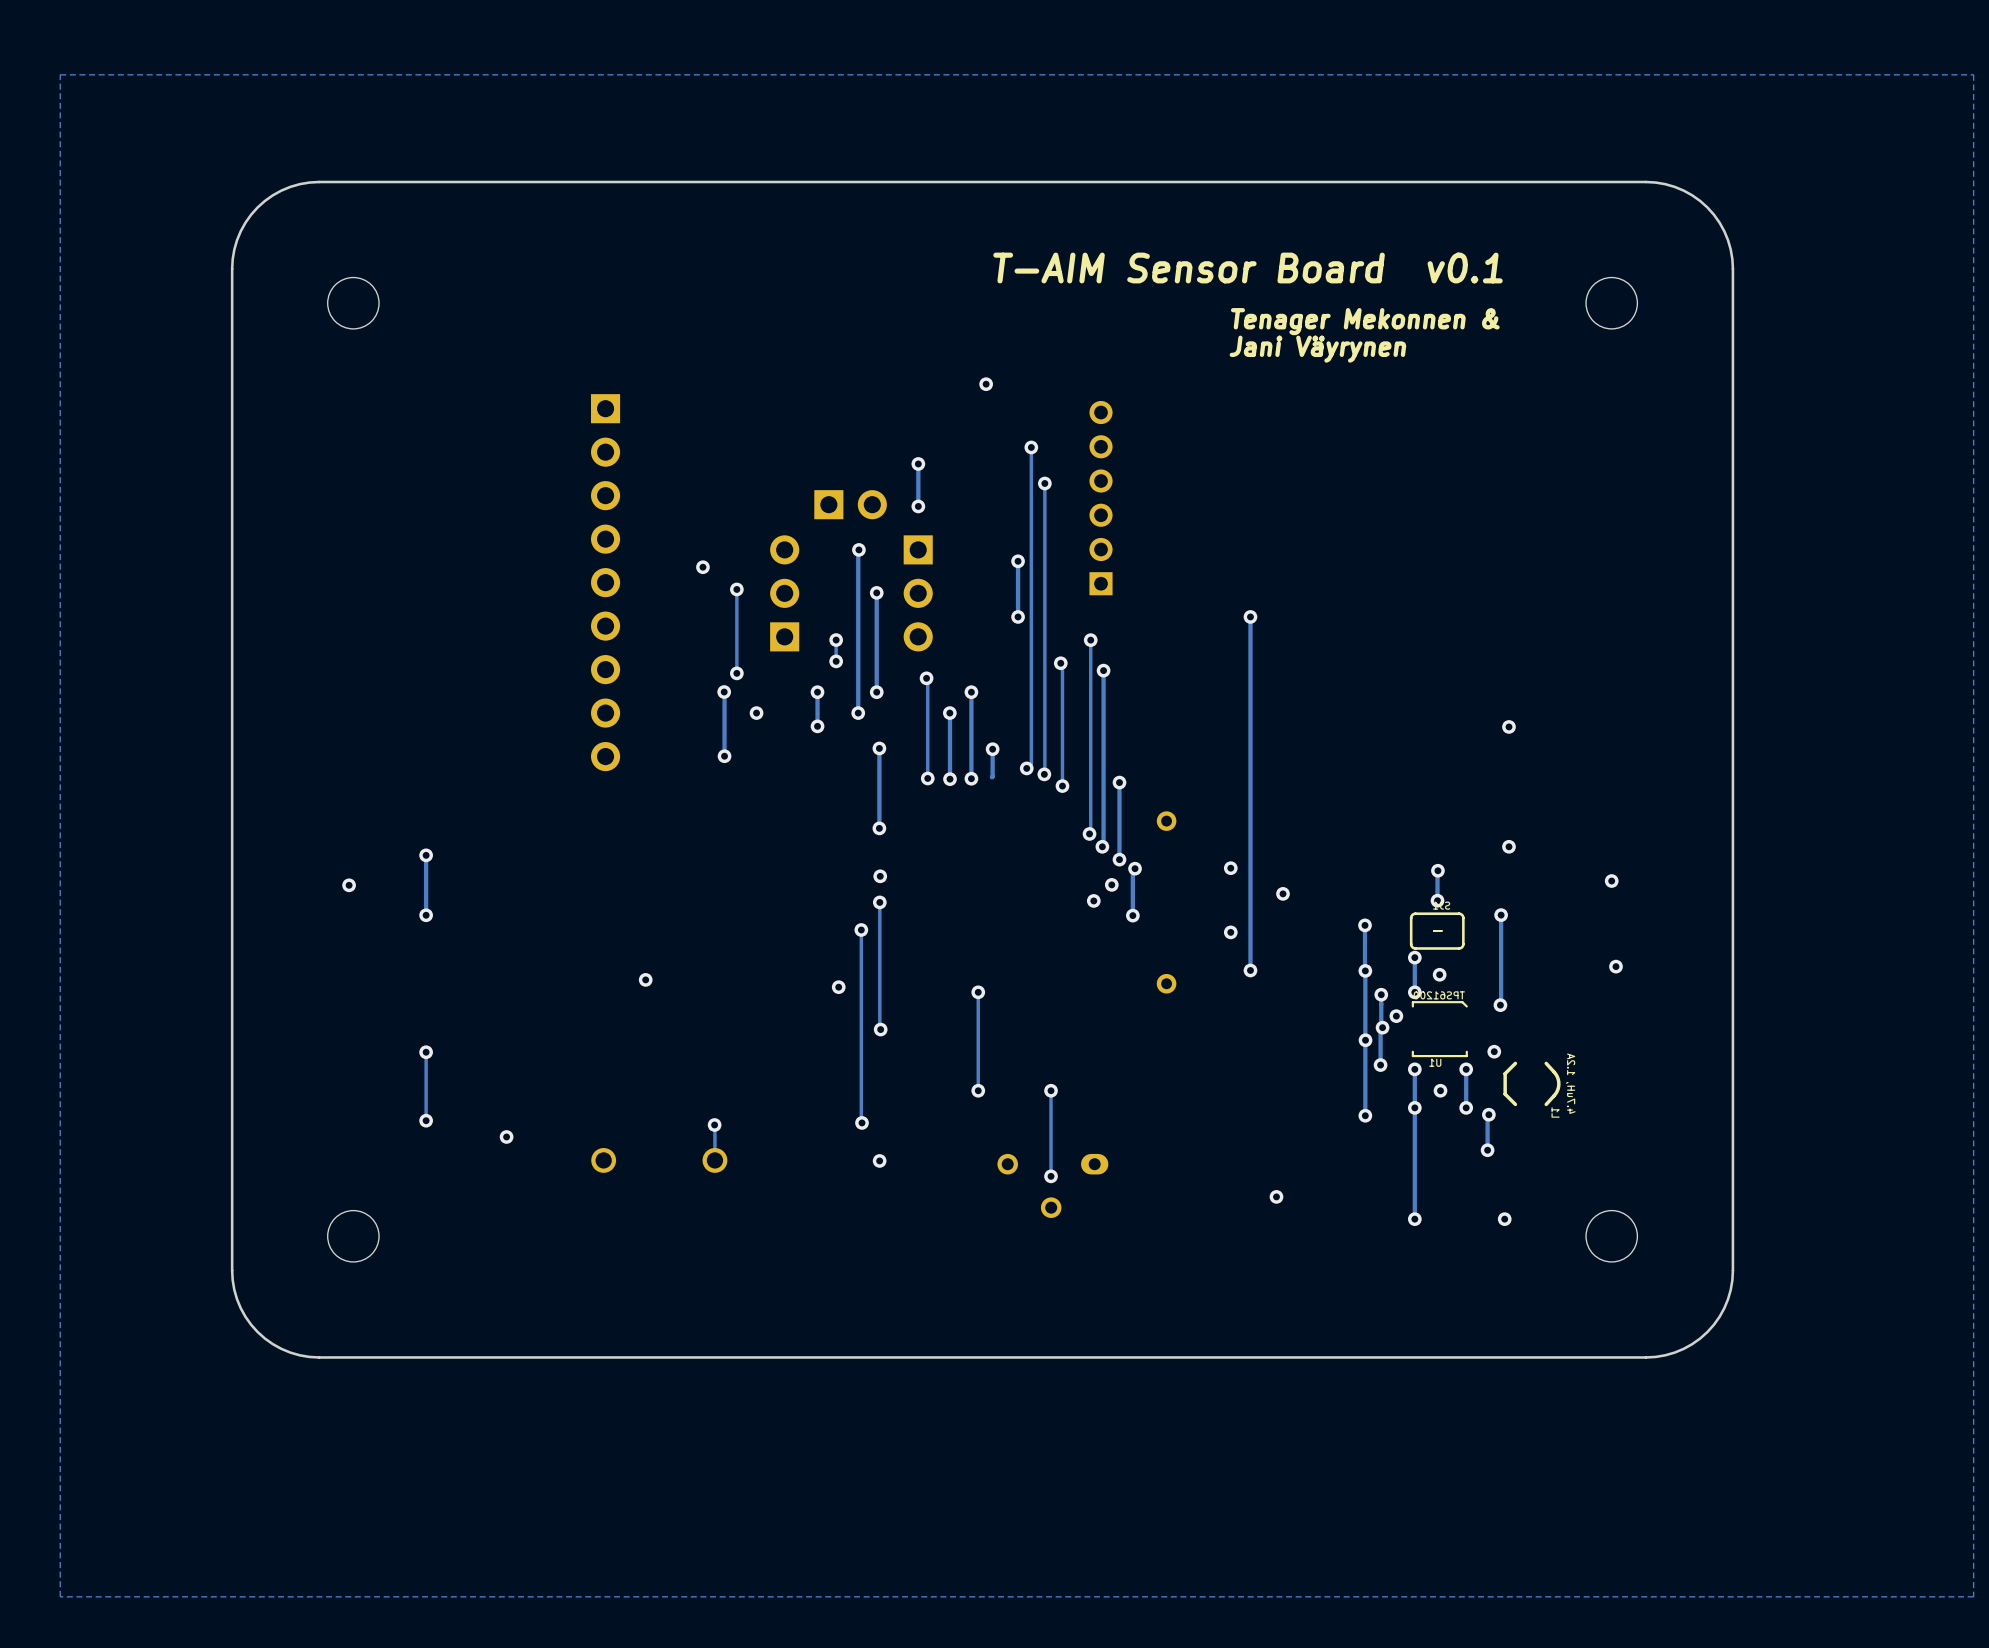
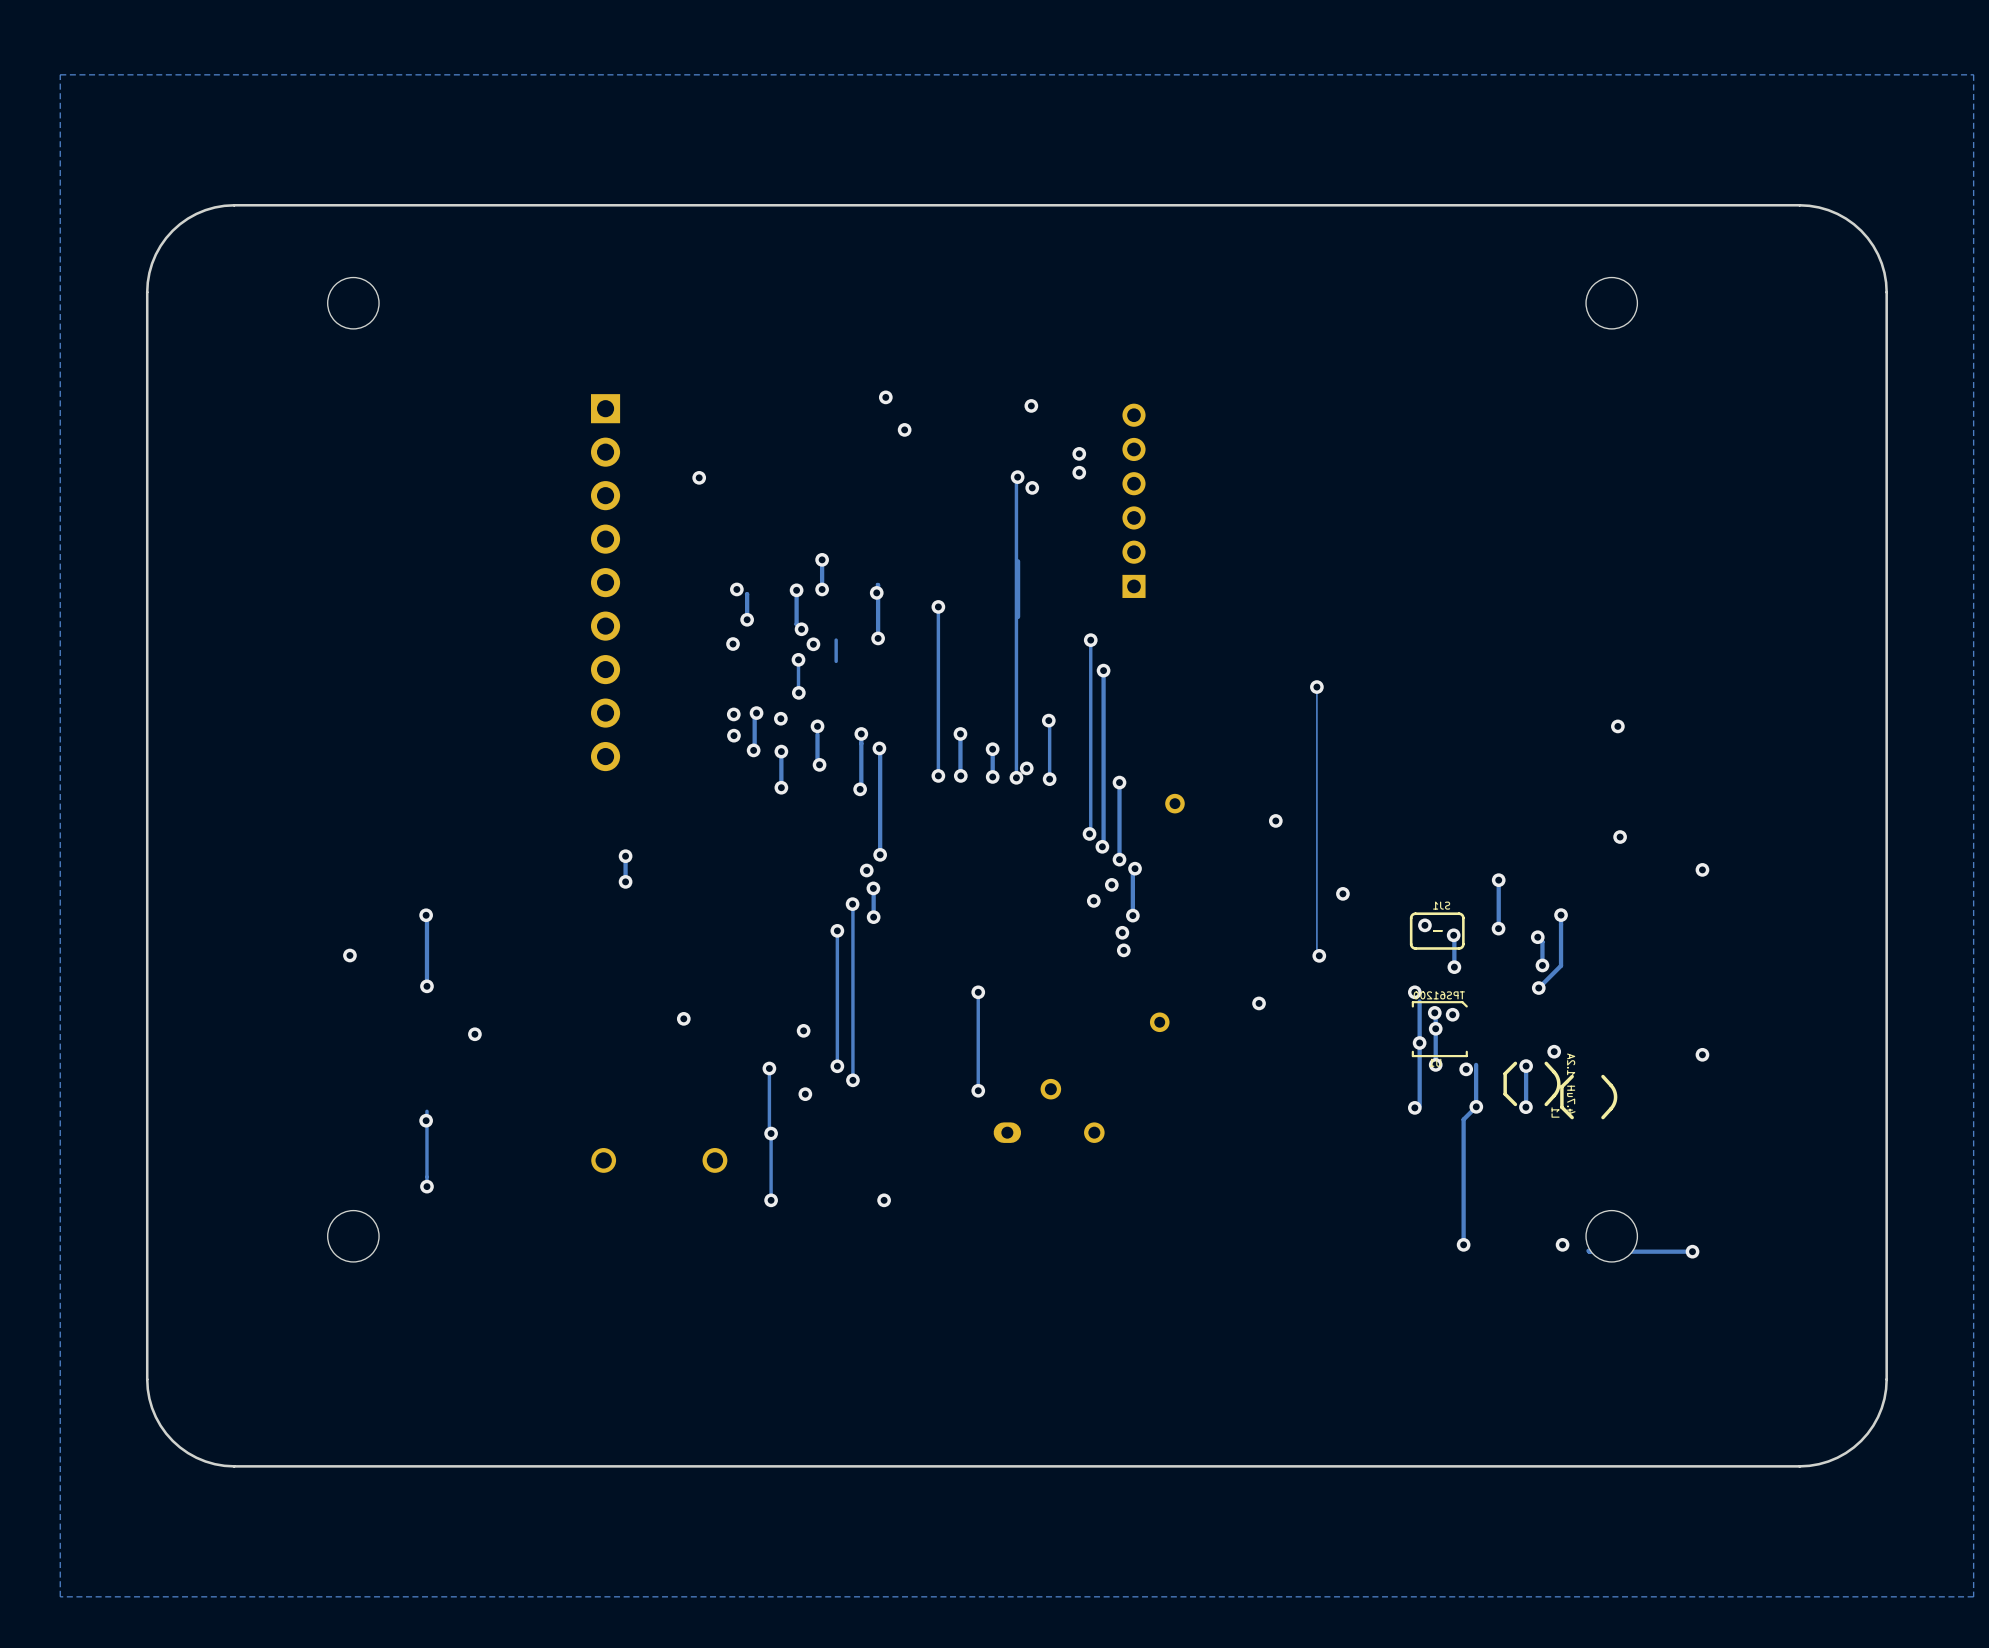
board edge: (1645, 182) (319, 182) (290, 186) (264, 200) (251, 214) (240, 231) (234, 249) (232, 268) (232, 1270) (237, 1299) (251, 1324) (264, 1338) (281, 1348) (299, 1355) (319, 1357) (1645, 1357) (1674, 1352) (1700, 1338) (1713, 1324) (1724, 1308) (1730, 1289) (1732, 1270) (1732, 268) (1728, 240) (1719, 222) (1707, 207) (1683, 190) (1665, 184) (1645, 182) -> (1799, 205) (1819, 207) (1837, 213) (1861, 230) (1873, 245) (1881, 263) (1886, 292) (1886, 1379) (1884, 1398) (1878, 1417) (1867, 1433) (1853, 1447) (1828, 1461) (1799, 1466) (234, 1466) (214, 1464) (196, 1457) (179, 1447) (166, 1433) (152, 1408) (147, 1379) (147, 292) (149, 272) (155, 254) (166, 238) (179, 224) (205, 210) (234, 205) (1799, 205)
text: T-AIM Sensor Board v0.1 (1247, 268) -> none
text: Tenager Mekonnen & (1365, 321) -> none
text: Jani Väyrynen (1317, 349) -> none
via: (986, 384) -> none
via: none -> (885, 397)
via: none -> (1031, 405)
track: (1031, 447) (1031, 763) (1026, 768) -> none
via: (1031, 447) -> none
via: none -> (1079, 453)
track: (918, 463) (918, 506) -> none
via position: (918, 463) -> (904, 429)
via: none -> (1079, 472)
via: none -> (699, 477)
track: none -> (1017, 477) (1016, 777)
via: none -> (1017, 477)
track: (1044, 483) (1044, 774) -> none
via position: (1044, 483) -> (1032, 487)
part position: (1101, 498) -> (1134, 500)
part: (850, 504) -> none
via: (918, 506) -> none
track: (858, 549) (858, 713) -> none
via: (858, 549) -> none
track: none -> (822, 559) (822, 589)
via: none -> (822, 559)
via: (1018, 561) -> none
via: (702, 567) -> none
track: none -> (877, 584) (878, 638)
track: (736, 589) (736, 673) -> none
via: none -> (822, 589)
track: none -> (796, 590) (796, 624) (801, 629)
via: none -> (796, 590)
track: (876, 592) (876, 692) -> none
part: (784, 593) -> none
part: (918, 593) -> none
track: none -> (747, 594) (747, 619)
track: none -> (938, 606) (938, 775)
via: none -> (938, 606)
via: (1018, 616) -> none
track: (1250, 616) (1250, 970) -> none
via position: (1250, 616) -> (1316, 687)
via: none -> (747, 619)
via: none -> (801, 629)
via: none -> (878, 638)
via: (836, 640) -> none
via: none -> (733, 644)
via: none -> (813, 644)
track: none -> (798, 659) (798, 692)
via: none -> (798, 659)
via: (836, 661) -> none
track: (1060, 663) (1062, 664) (1062, 786) -> none
via: (1060, 663) -> none
via: (736, 673) -> none
track: (926, 678) (927, 778) -> none
via: (926, 678) -> none
track: none -> (1316, 687) (1316, 953) (1319, 955)
track: (724, 692) (724, 756) -> none
via: (724, 692) -> none
via: none -> (798, 692)
track: (817, 692) (817, 726) -> none
via: (817, 692) -> none
via: (876, 692) -> none
track: (971, 692) (971, 778) -> none
via: (971, 692) -> none
via position: (858, 713) -> (861, 733)
via: (949, 713) -> none
track: (950, 713) (950, 779) -> none
via: none -> (733, 714)
track: none -> (754, 718) (753, 750)
via: none -> (780, 718)
track: none -> (1048, 720) (1049, 779)
via: none -> (1048, 720)
via: (1508, 726) -> none
via: none -> (1617, 726)
track: none -> (861, 733) (860, 789)
track: none -> (960, 733) (960, 775)
via: none -> (960, 733)
track: none -> (817, 734) (817, 762) (819, 764)
via: none -> (733, 735)
track: (879, 748) (879, 828) -> (879, 748) (880, 854)
via: none -> (753, 750)
track: none -> (781, 751) (781, 787)
via: none -> (781, 751)
via: (724, 756) -> none
via: none -> (819, 764)
via: (1044, 774) -> none
via: none -> (938, 775)
via: none -> (960, 775)
via: none -> (992, 776)
via: none -> (1016, 777)
via: (927, 778) -> none
via: (971, 778) -> none
via: (950, 779) -> none
via: none -> (1049, 779)
via: (1062, 786) -> none
via: none -> (781, 787)
via: none -> (860, 789)
via: none -> (1275, 820)
part position: (1166, 821) -> (1174, 803)
via: (879, 828) -> none
via: none -> (1620, 837)
via: (1508, 846) -> none
via: none -> (880, 854)
track: (426, 855) (426, 915) -> none
via: (426, 855) -> none
track: none -> (625, 856) (625, 881)
via: none -> (625, 856)
via: (1230, 868) -> none
via: none -> (1702, 869)
via: none -> (866, 870)
via: (1437, 870) -> none
track: (1438, 871) (1437, 900) -> none
via: (880, 876) -> none
track: none -> (1498, 880) (1498, 928)
via: none -> (1498, 880)
via: none -> (625, 881)
via: (1611, 881) -> none
via: (349, 885) -> none
track: none -> (873, 888) (873, 917)
via: none -> (873, 888)
via: (1283, 893) -> none
via: none -> (1342, 893)
via: (1437, 900) -> none
track: (879, 902) (880, 1029) -> none
via: (879, 902) -> none
track: none -> (852, 904) (852, 1080)
via: none -> (852, 904)
track: (1501, 915) (1500, 1005) -> none
via position: (1501, 915) -> (1498, 928)
track: none -> (1561, 915) (1561, 965) (1538, 988)
via: none -> (1561, 915)
via: none -> (873, 917)
track: (1365, 925) (1365, 1040) -> none
via: (1365, 925) -> none
via: none -> (1424, 925)
track: (861, 929) (862, 1122) -> none
via: (861, 929) -> none
track: none -> (837, 930) (837, 1066)
via: none -> (837, 930)
via: none -> (1122, 932)
via: (1230, 932) -> none
track: none -> (1453, 935) (1454, 967)
via: none -> (1453, 935)
track: none -> (1537, 937) (1542, 941) (1542, 965)
via: none -> (1537, 937)
via: none -> (1123, 950)
via: none -> (349, 955)
via: none -> (1319, 955)
track: (1414, 957) (1414, 992) -> none
via: (1414, 957) -> none
via: none -> (1542, 965)
via: (1615, 966) -> none
via position: (1250, 970) -> (1259, 1003)
via: (1365, 970) -> none
via position: (1439, 974) -> (1454, 967)
via: (645, 979) -> none
part position: (1166, 983) -> (1159, 1022)
via: none -> (426, 986)
via: (838, 987) -> none
via: none -> (1538, 988)
track: (1381, 994) (1381, 1026) -> none
via: (1381, 994) -> none
track: none -> (1419, 1001) (1419, 1106)
via: (1500, 1005) -> none
track: none -> (1434, 1012) (1435, 1064)
via: none -> (1434, 1012)
via: none -> (1452, 1014)
via: (1396, 1016) -> none
via: none -> (683, 1018)
track: (1381, 1026) (1380, 1065) -> none
via: (1382, 1027) -> none
via: none -> (1435, 1028)
via: (880, 1029) -> none
via: none -> (803, 1030)
via: none -> (474, 1034)
track: (1365, 1040) (1365, 1115) -> none
via: (1365, 1040) -> none
via: none -> (1419, 1042)
via: (1494, 1051) -> none
via: none -> (1554, 1051)
track: (426, 1052) (426, 1120) -> (426, 917) (426, 986)
via: (426, 1052) -> none
via: none -> (1702, 1054)
via: none -> (1435, 1064)
track: none -> (1476, 1064) (1476, 1106)
via: (1380, 1065) -> none
via: none -> (837, 1066)
track: none -> (1526, 1066) (1526, 1107)
via: none -> (1526, 1066)
track: none -> (769, 1068) (771, 1200)
via: none -> (769, 1068)
track: (1414, 1069) (1414, 1219) -> none
via: (1414, 1069) -> none
track: (1466, 1069) (1466, 1107) -> none
via: none -> (852, 1080)
track: (1051, 1090) (1051, 1176) -> none
via: (1051, 1090) -> none
via: (1440, 1090) -> none
via: none -> (805, 1094)
part: none -> (1588, 1097)
track: none -> (1476, 1106) (1463, 1119) (1463, 1244)
via: none -> (1476, 1106)
via: (1466, 1107) -> none
via: none -> (1525, 1107)
track: none -> (426, 1111) (426, 1186)
track: (1488, 1114) (1487, 1150) -> none
via: (1488, 1114) -> none
via: (1365, 1115) -> none
via: (862, 1122) -> none
track: (714, 1124) (714, 1160) -> none
via: (714, 1124) -> none
via: none -> (771, 1133)
via: (506, 1136) -> none
via: (1487, 1150) -> none
via position: (879, 1160) -> (884, 1200)
via: (1051, 1176) -> none
part rotation: 0° (1052, 1185) -> 180° (1049, 1110)
part position: (1052, 1185) -> (1049, 1110)
via: none -> (426, 1186)
via: (1276, 1196) -> none
via: none -> (771, 1200)
via: (1414, 1219) -> none
via: (1504, 1219) -> none
via: none -> (1463, 1244)
via: none -> (1562, 1244)
track: none -> (1588, 1250) (1692, 1251)
via: none -> (1692, 1251)

